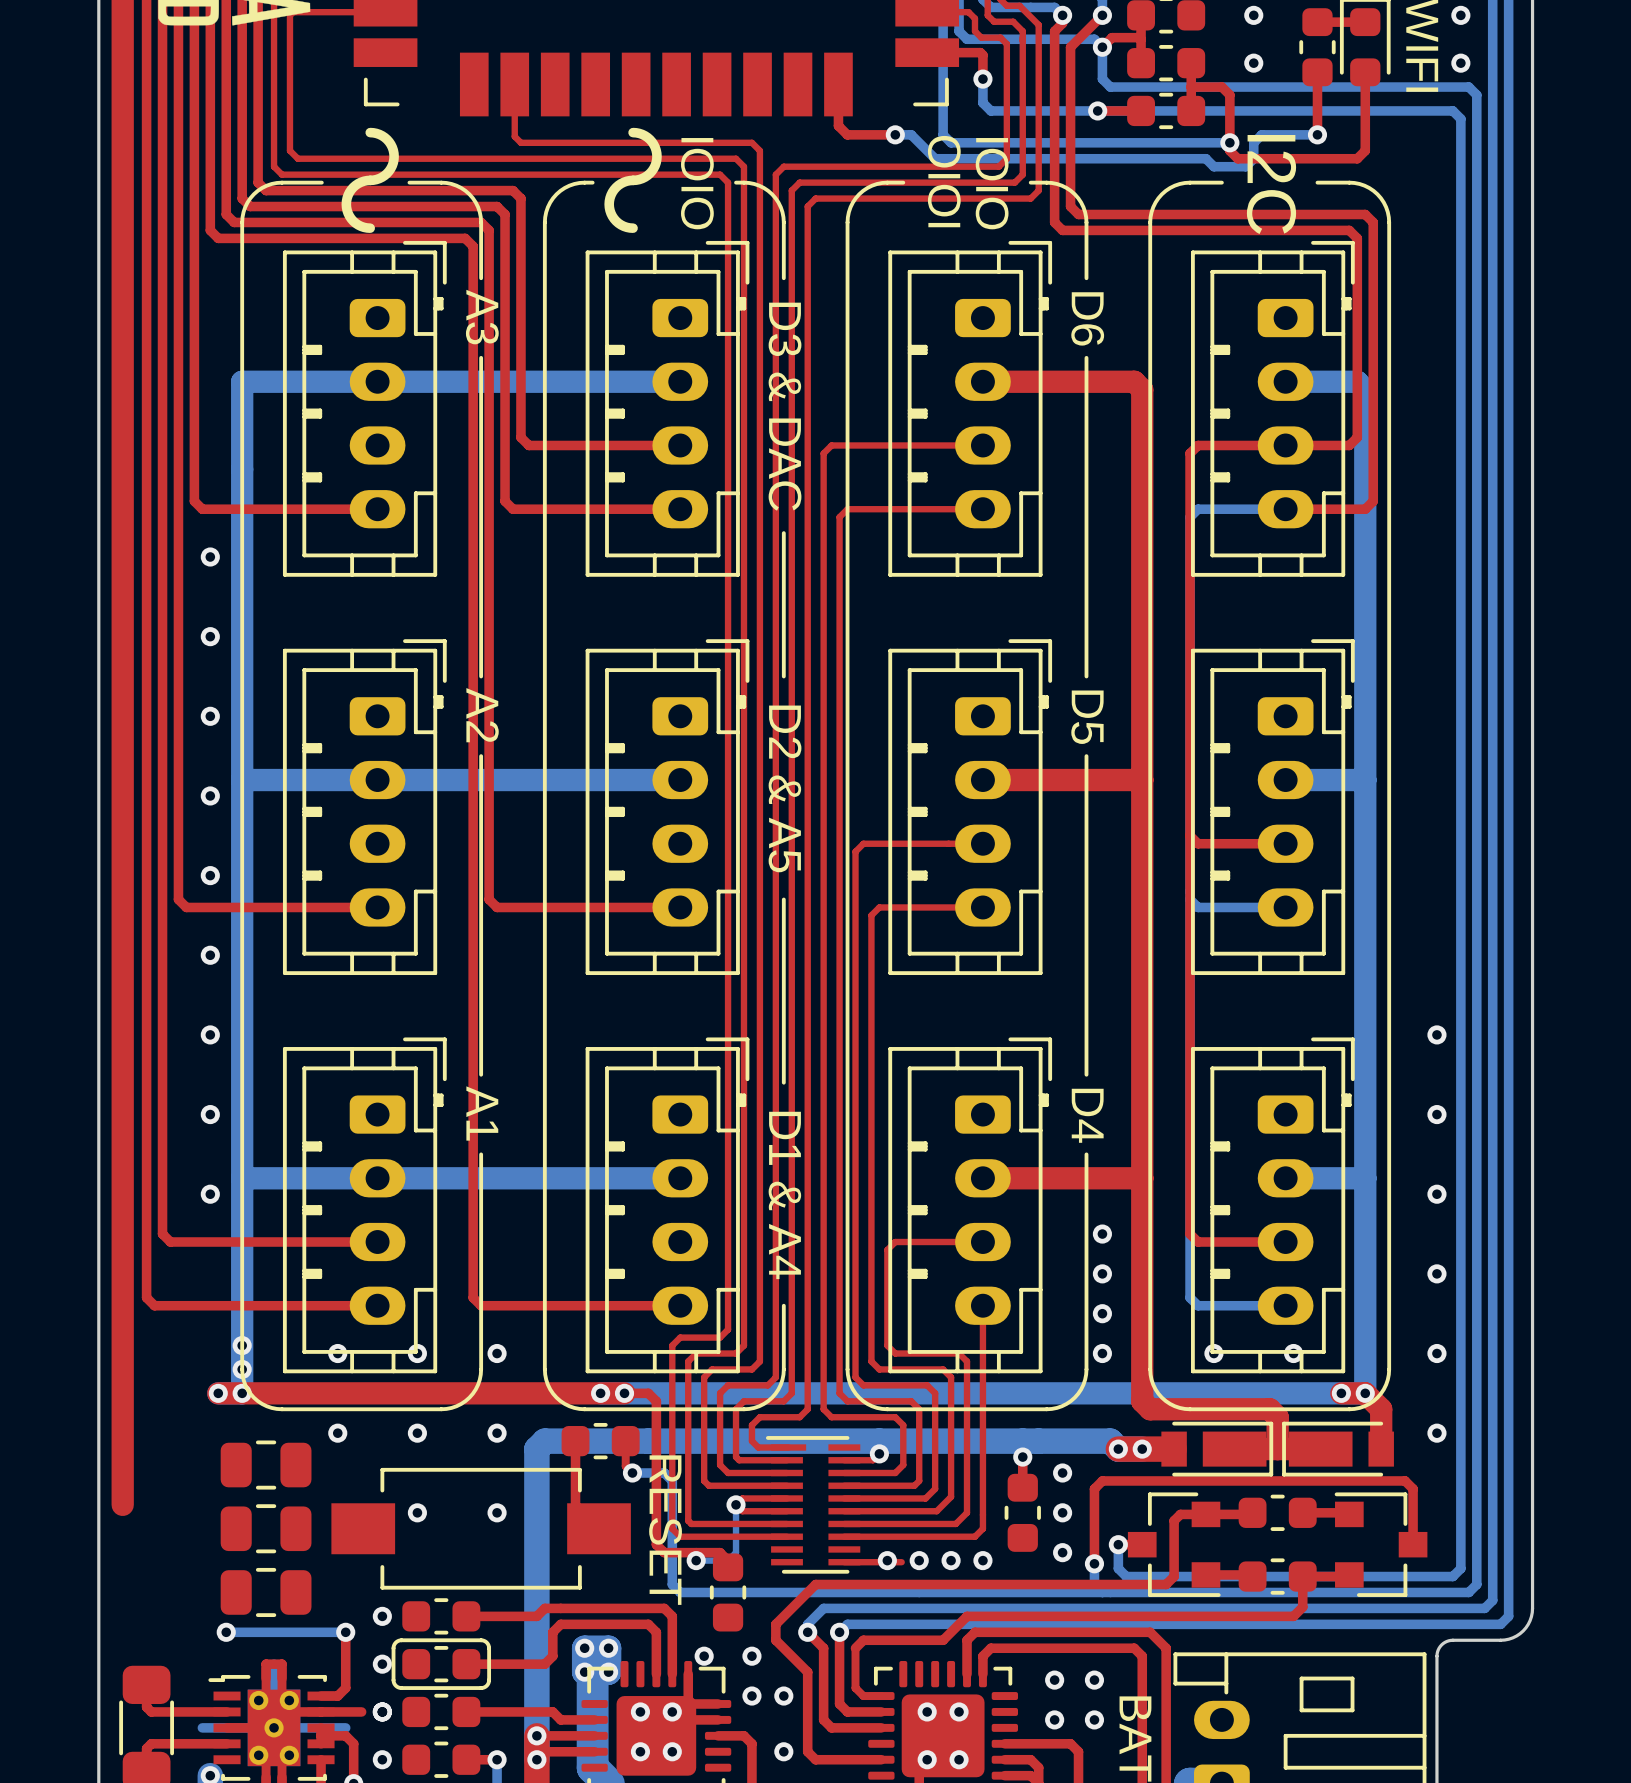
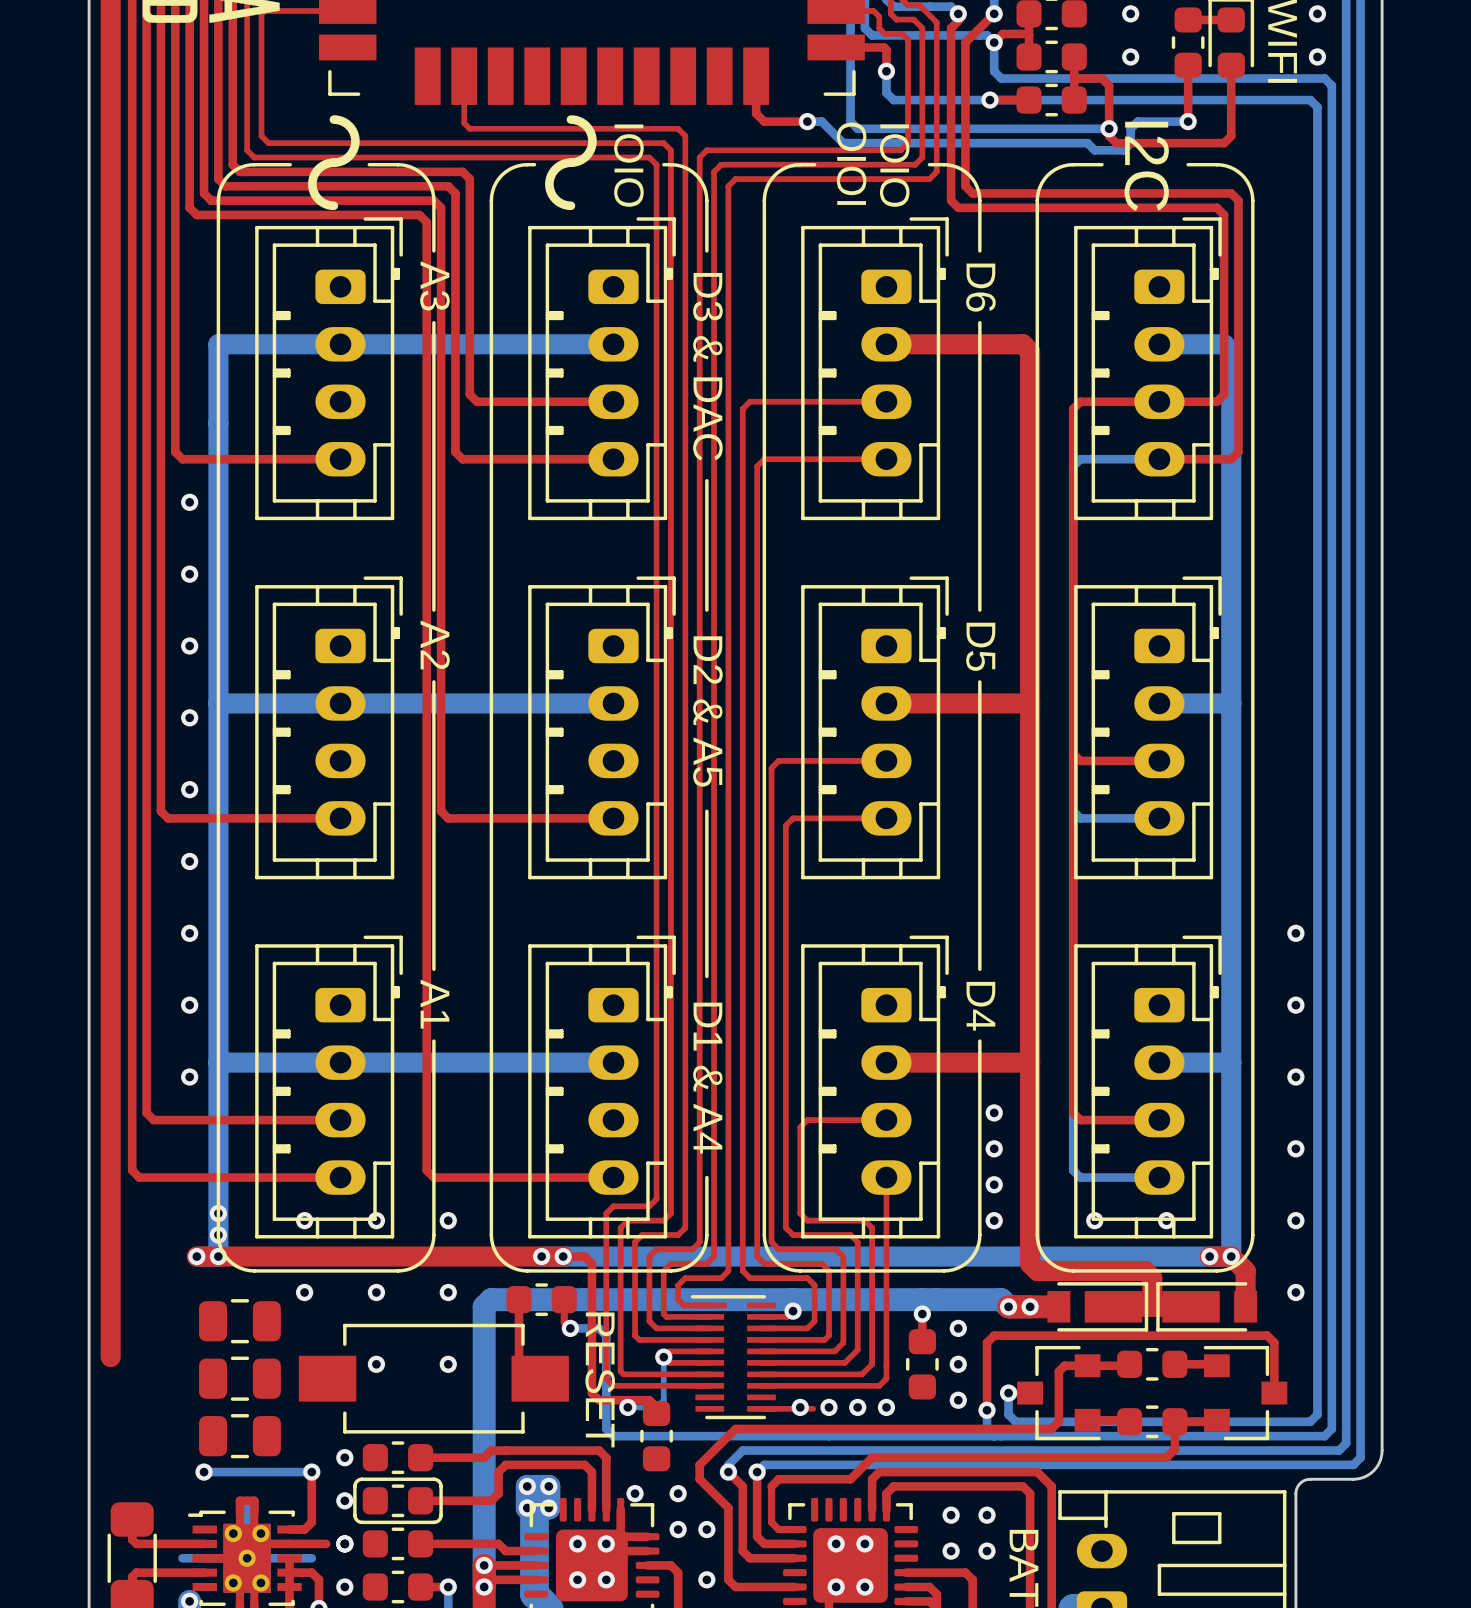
top track: (321, 1735) (345, 1735) (353, 1743) (353, 1751) -> (289, 1587) (289, 1572) (311, 1572) (318, 1579)

